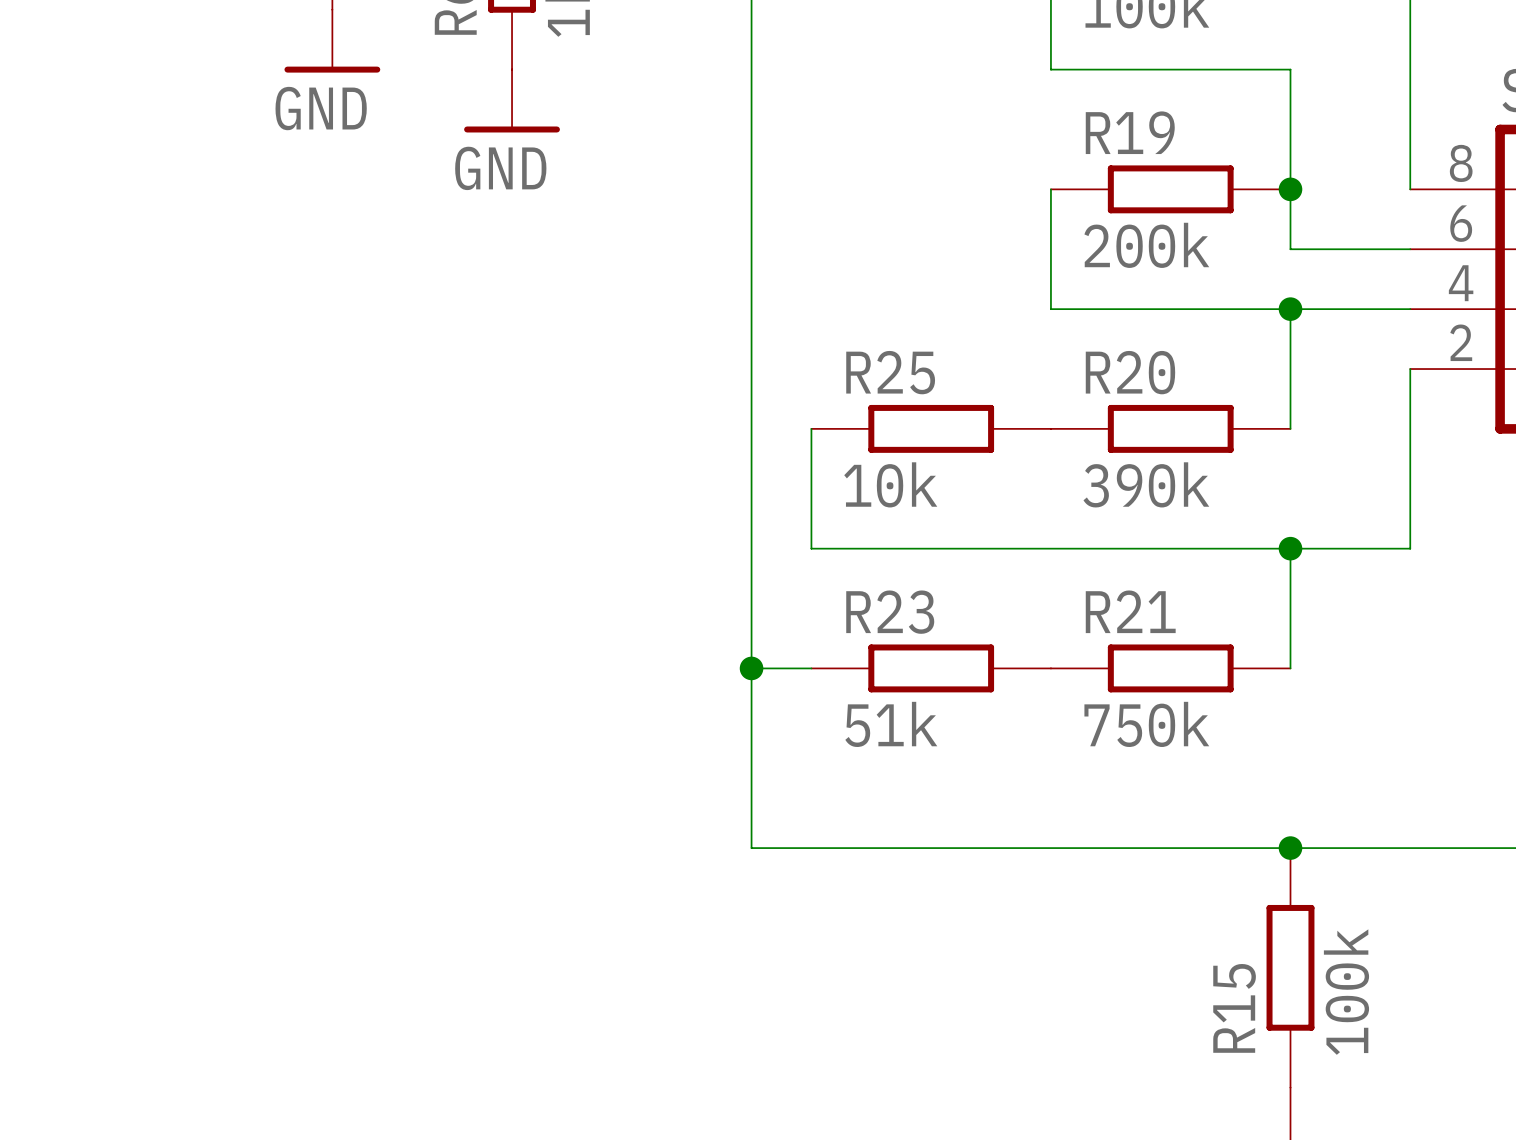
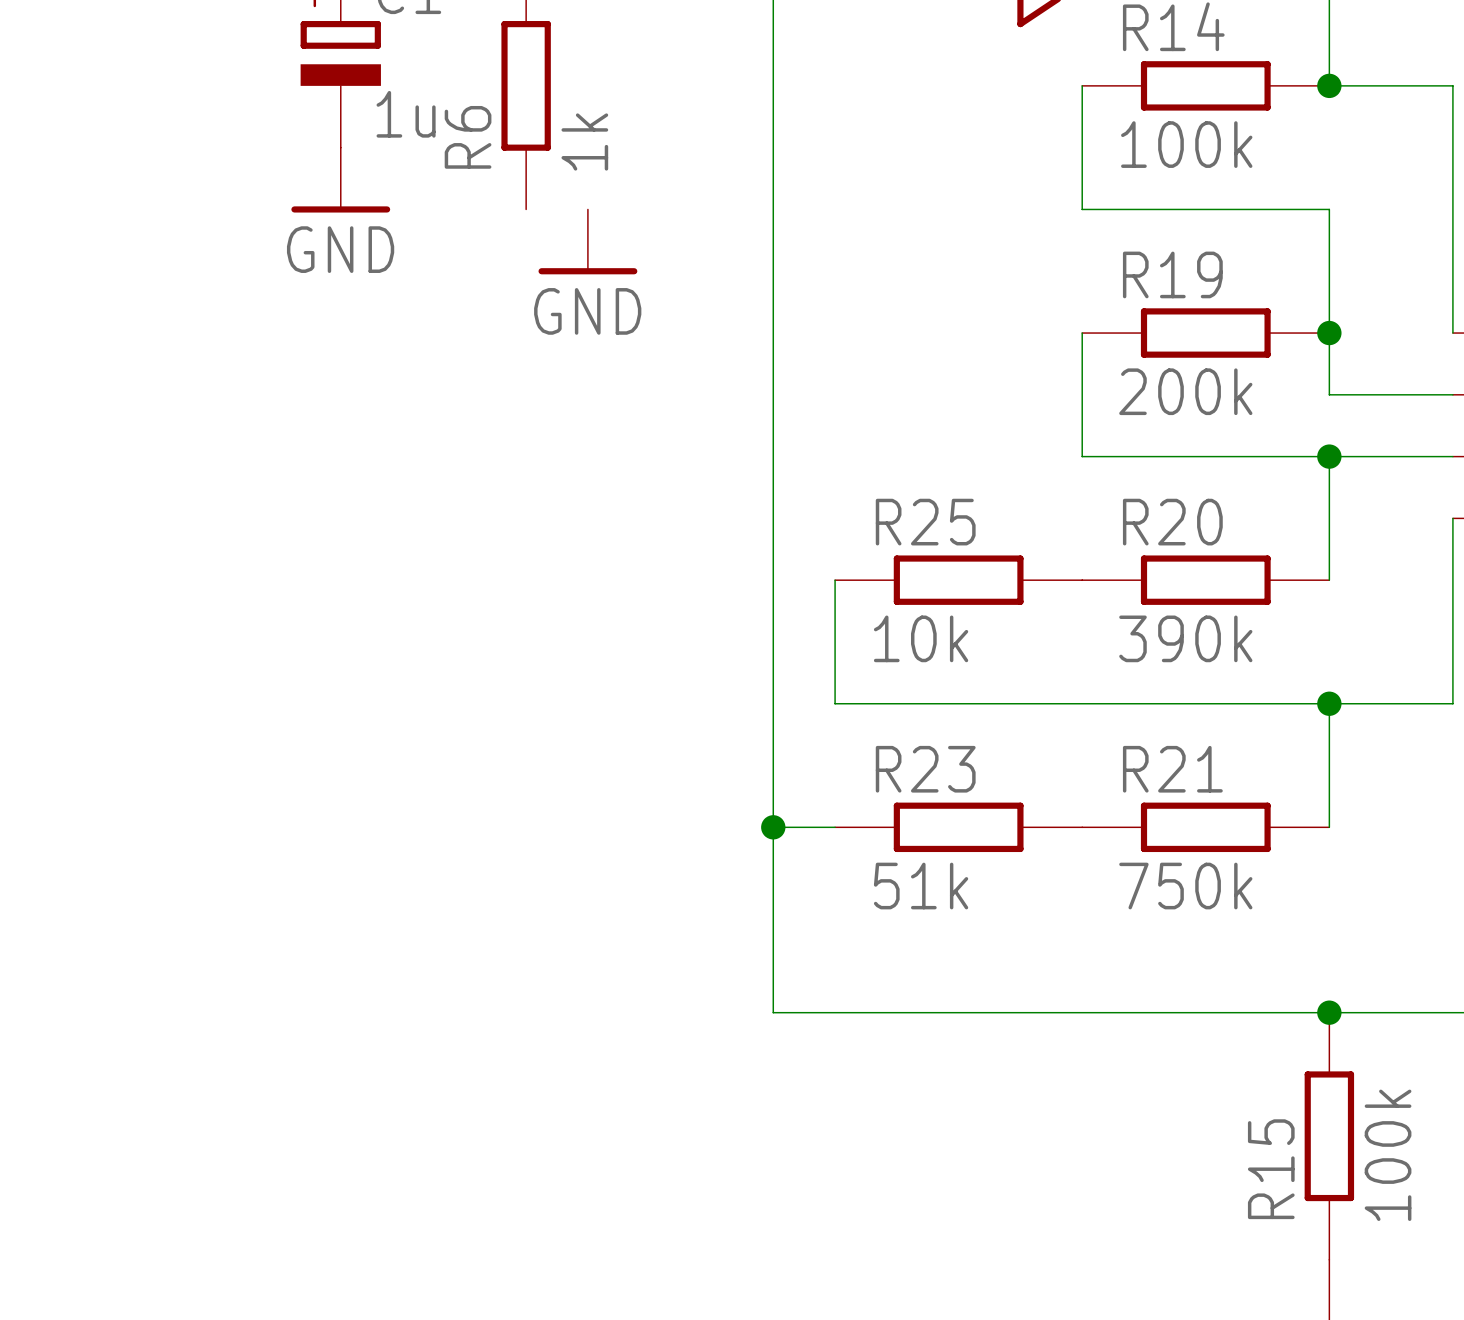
power symbol position: GND (512, 101) -> GND (587, 241)

